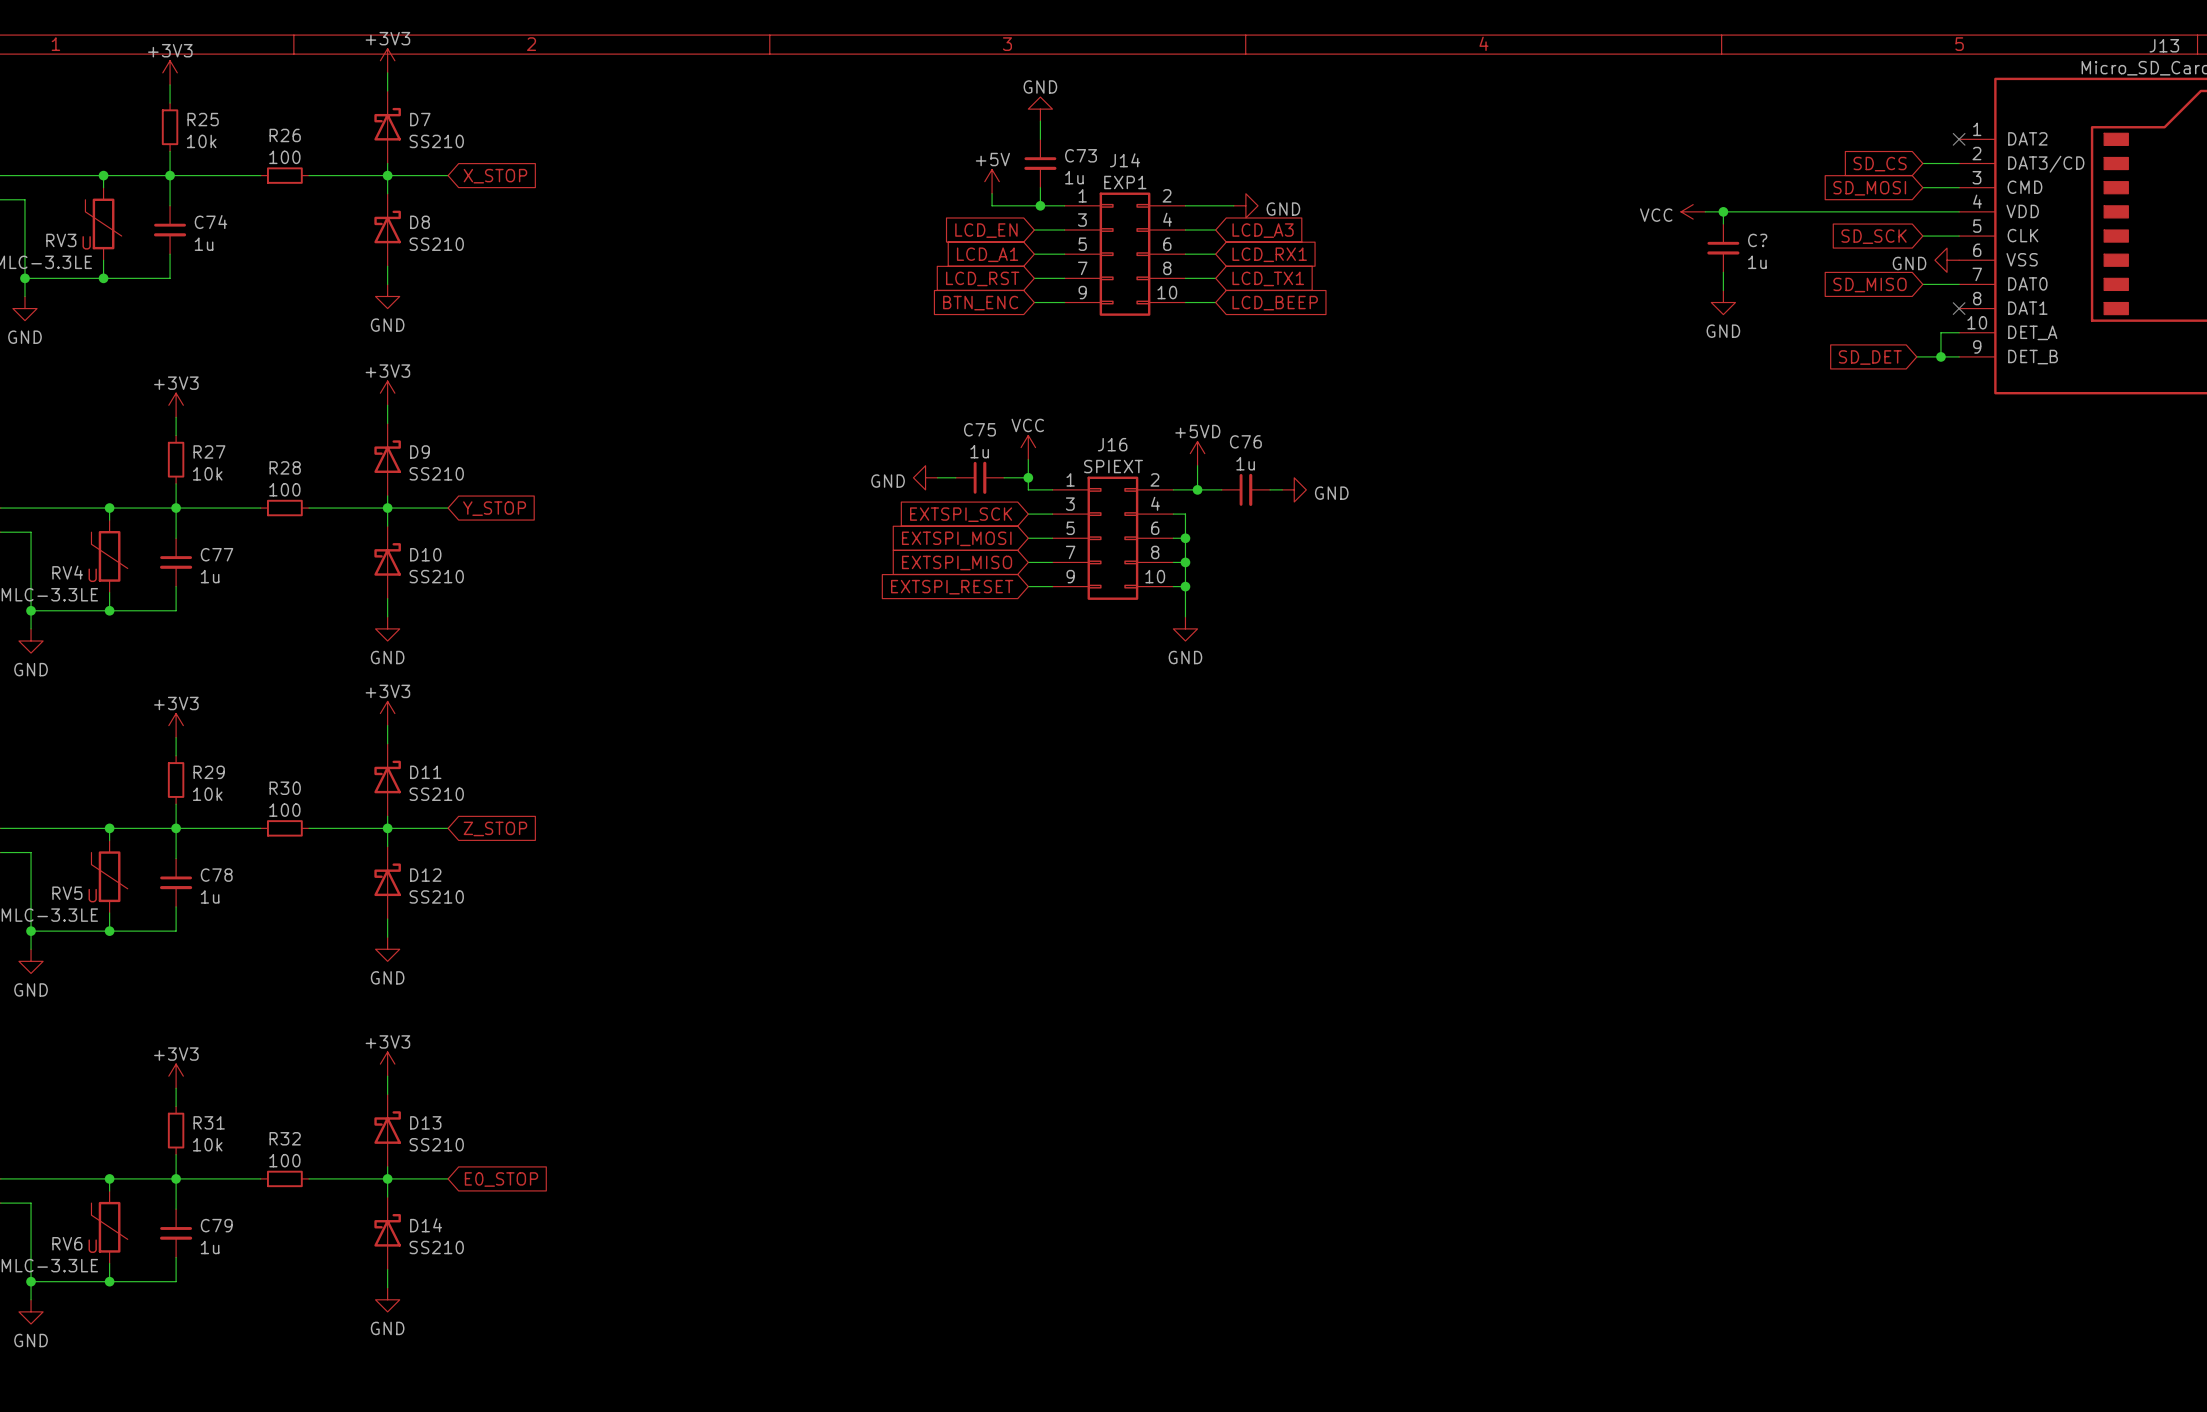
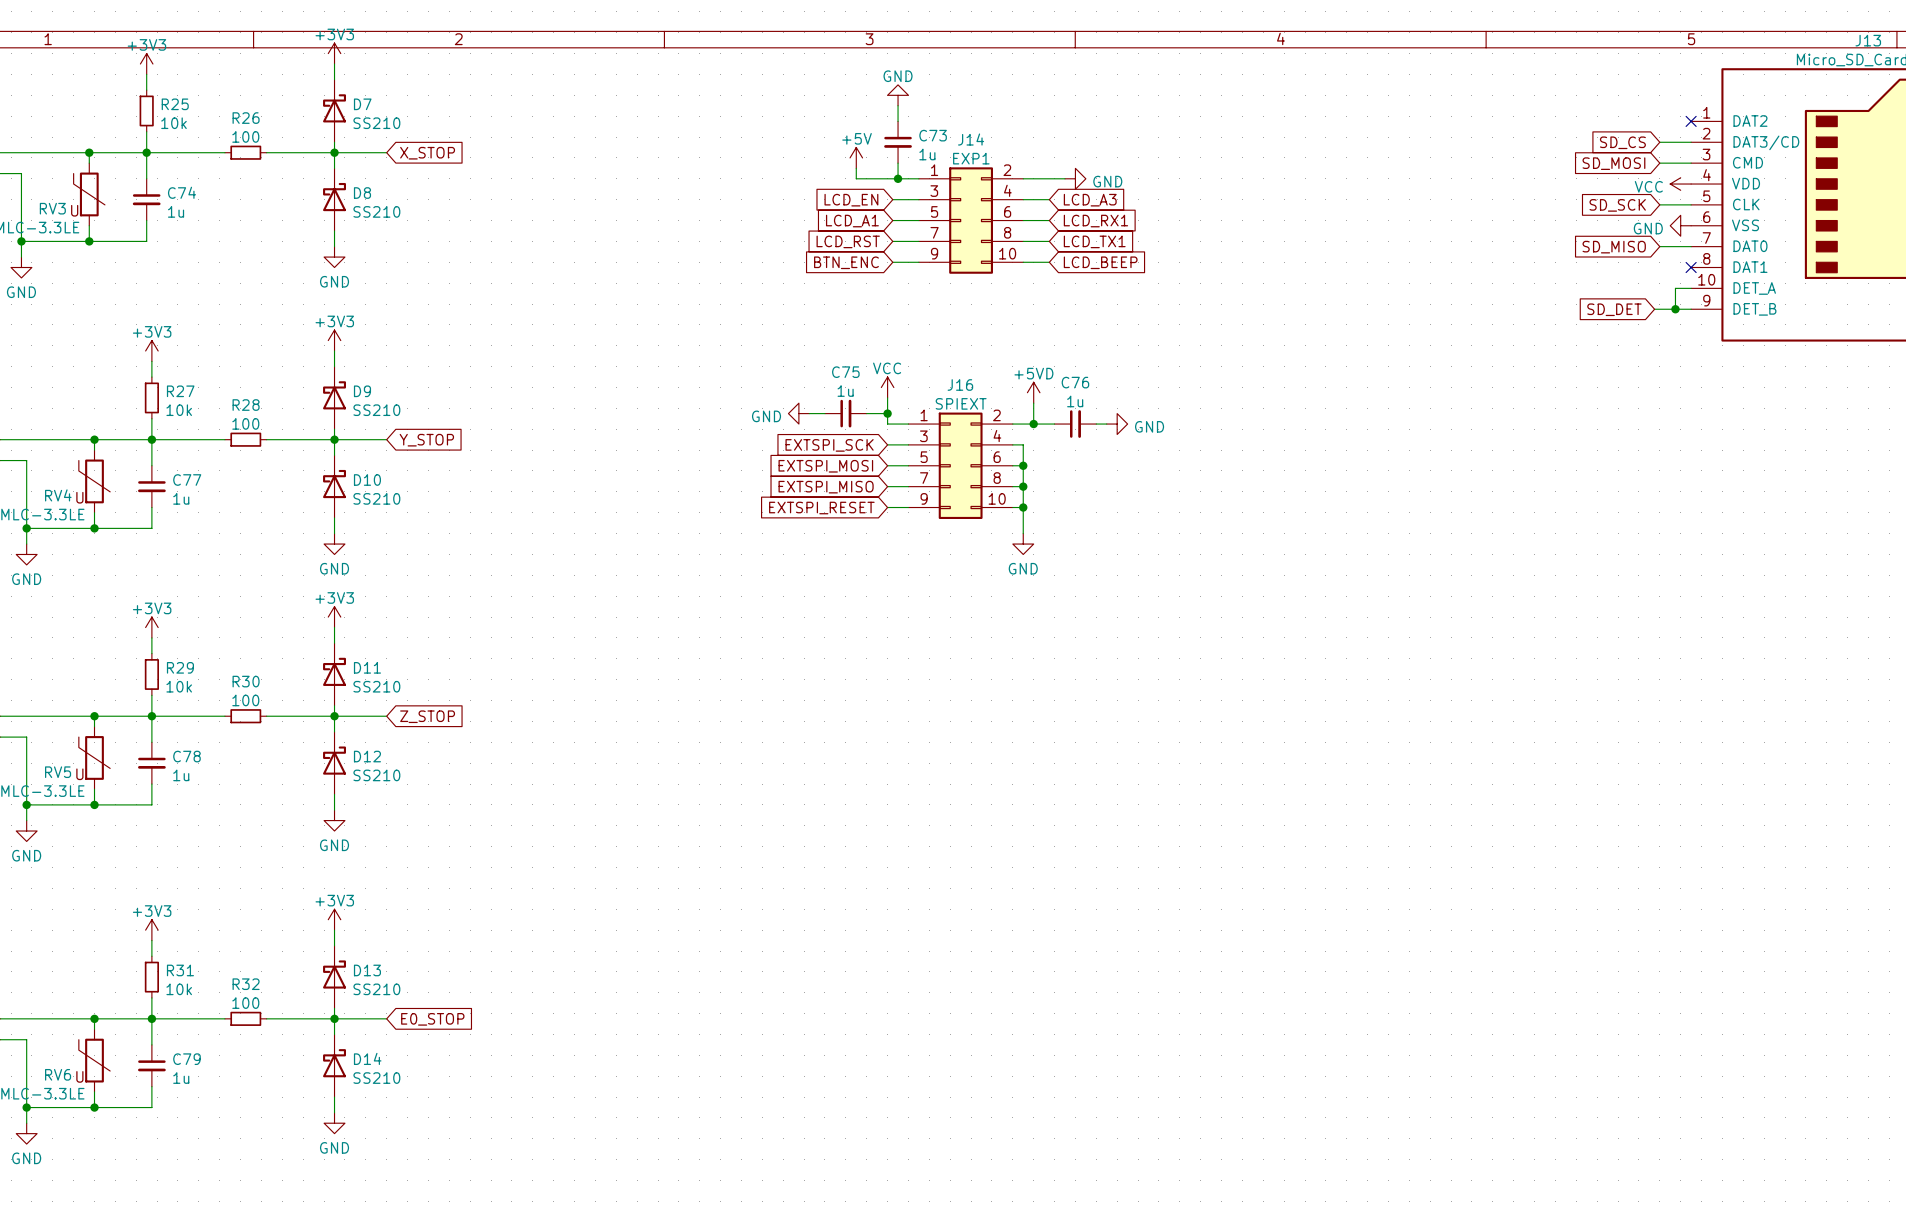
power symbol: VCC (1693, 211) -> none
wire: (1705, 211) (1959, 211) -> none
wire: (1723, 211) (1723, 223) -> none
junction: (1723, 211) -> none
power symbol: none -> VCC (1680, 184)
C?: 1u (1723, 248) -> none
wire: (1723, 272) (1723, 290) -> none
power symbol: GND (1723, 302) -> none

